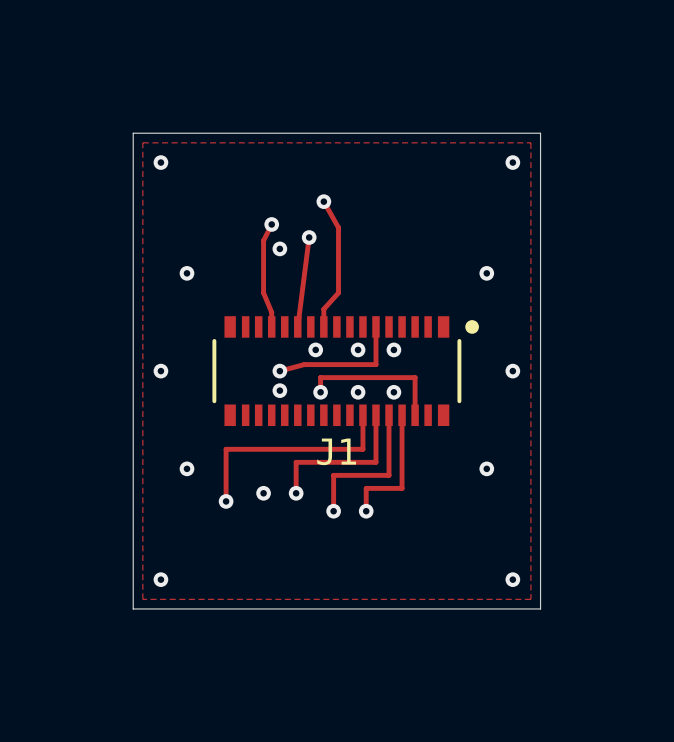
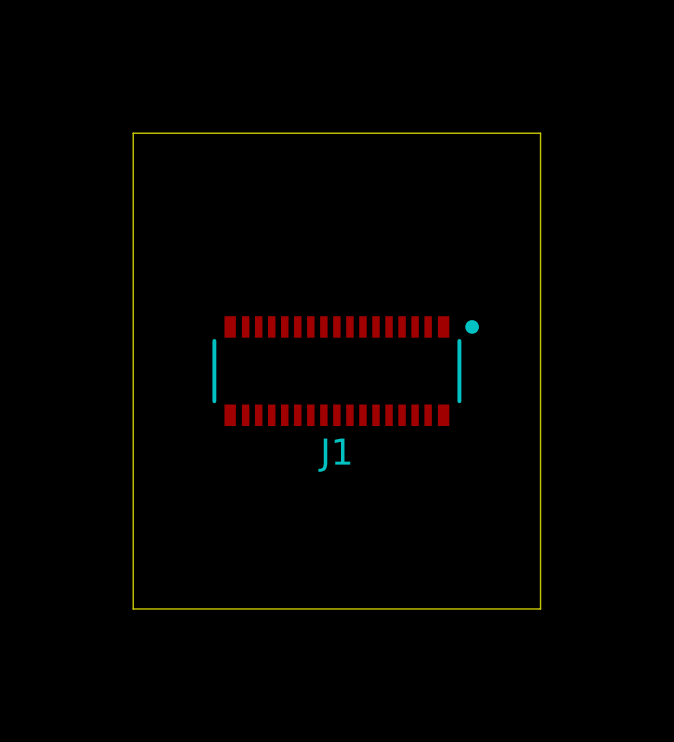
zone outline: (142, 142) (530, 142) (530, 599) (142, 599) (142, 142) -> none
via: (160, 162) -> none
via: (512, 162) -> none
track: (323, 201) (338, 227) (338, 292) (323, 309) (323, 326) -> none
via: (323, 201) -> none
track: (271, 224) (263, 240) (263, 292) (271, 312) (271, 326) -> none
via: (271, 224) -> none
track: (309, 237) (297, 326) -> none
via: (309, 237) -> none
via: (279, 248) -> none
via: (187, 273) -> none
via: (486, 273) -> none
track: (375, 326) (375, 364) (304, 364) (279, 371) -> none
via: (315, 349) -> none
via: (358, 349) -> none
via: (393, 349) -> none
via: (160, 371) -> none
via: (279, 371) -> none
via: (512, 371) -> none
via: (279, 390) -> none
track: (320, 392) (320, 377) (415, 377) (415, 415) -> none
via: (320, 392) -> none
via: (358, 392) -> none
via: (393, 392) -> none
track: (362, 415) (362, 449) (226, 449) (226, 501) -> none
track: (375, 415) (375, 462) (296, 462) (296, 493) -> none
track: (389, 415) (389, 475) (333, 475) (333, 511) -> none
track: (402, 415) (402, 488) (366, 488) (366, 511) -> none
via: (187, 468) -> none
via: (486, 468) -> none
via: (263, 493) -> none
via: (296, 493) -> none
via: (226, 501) -> none
via: (333, 511) -> none
via: (366, 511) -> none
via: (160, 579) -> none
via: (512, 579) -> none

